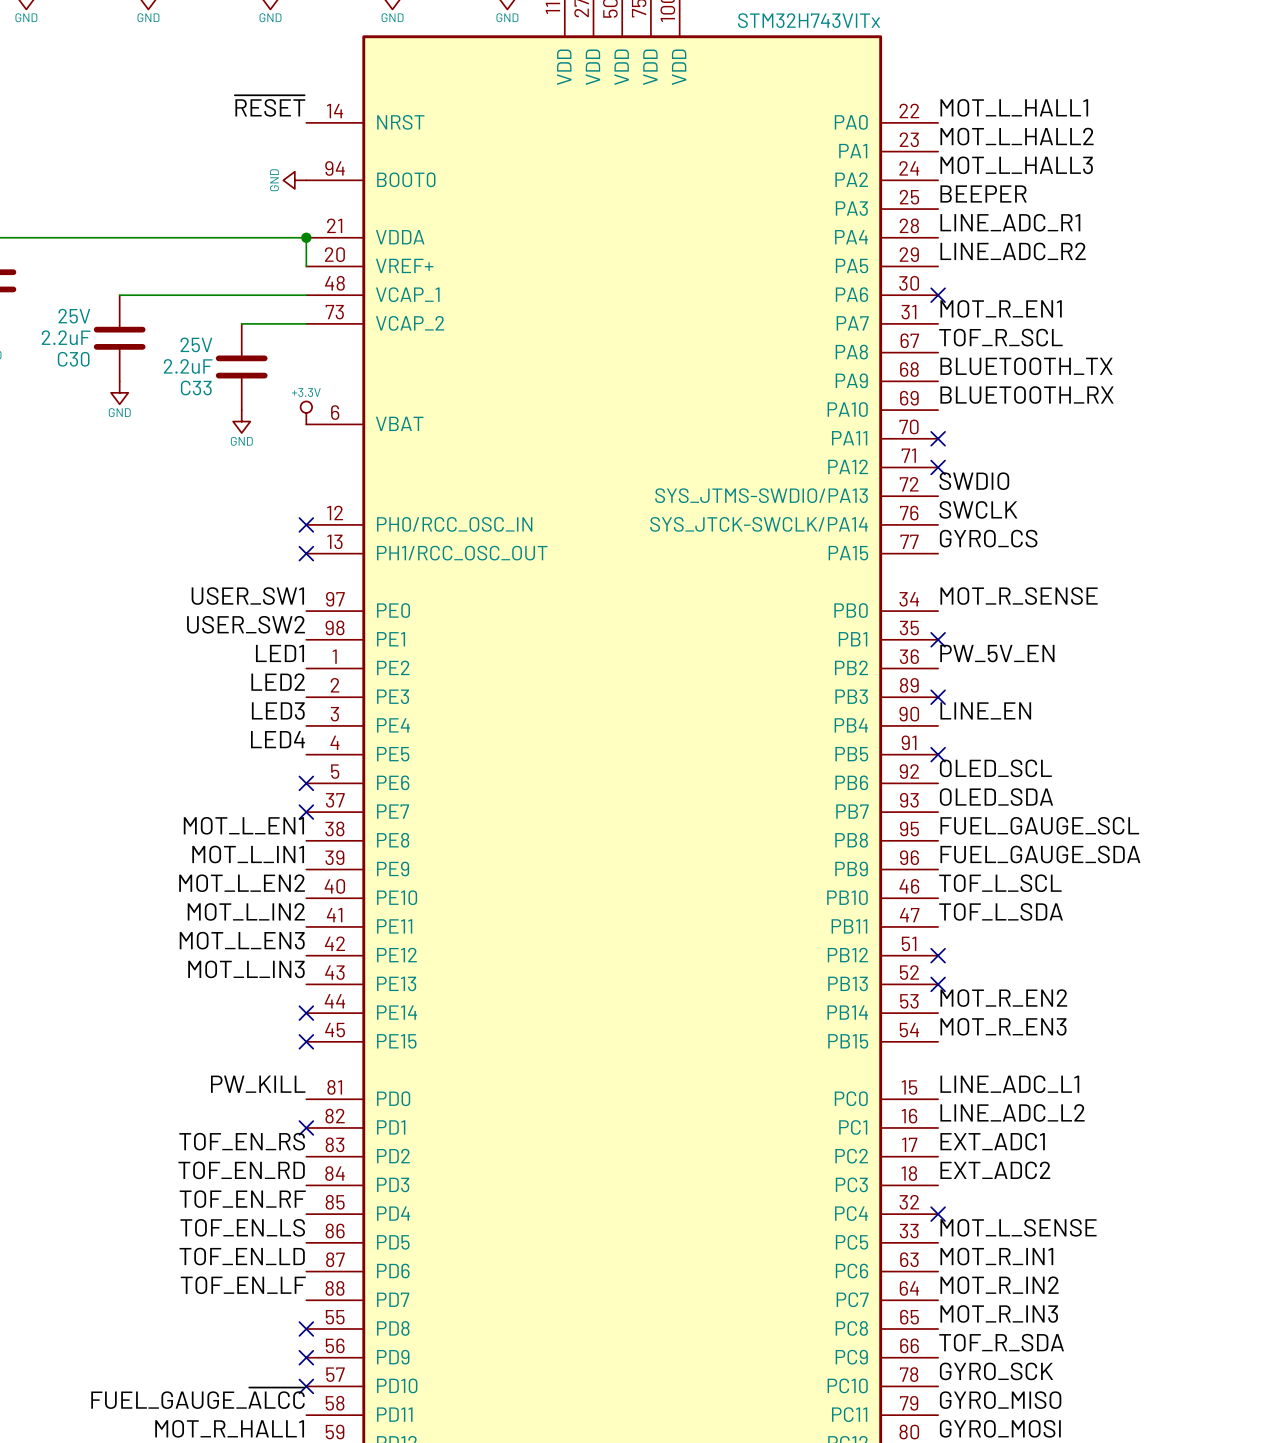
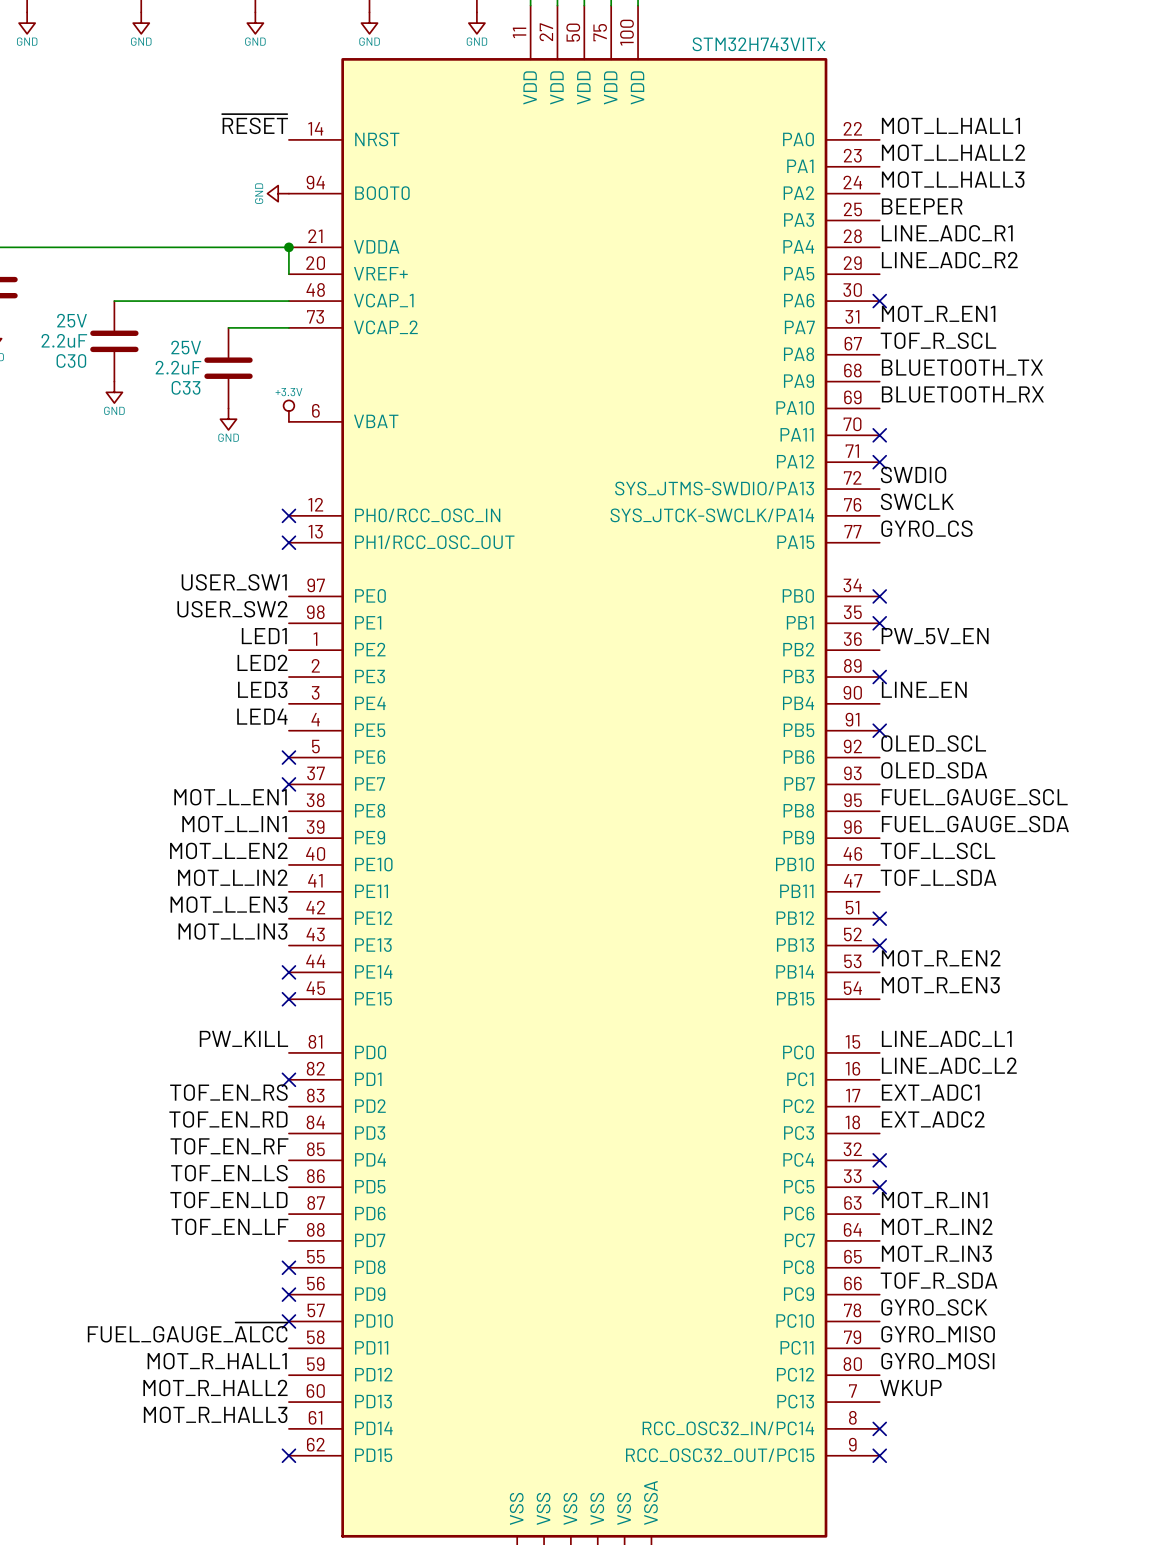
label: MOT_R_SENSE (1019, 596) -> none
no-connect mark: none -> (879, 596)
label: MOT_L_SENSE (1018, 1227) -> none
no-connect mark: none -> (879, 1187)

